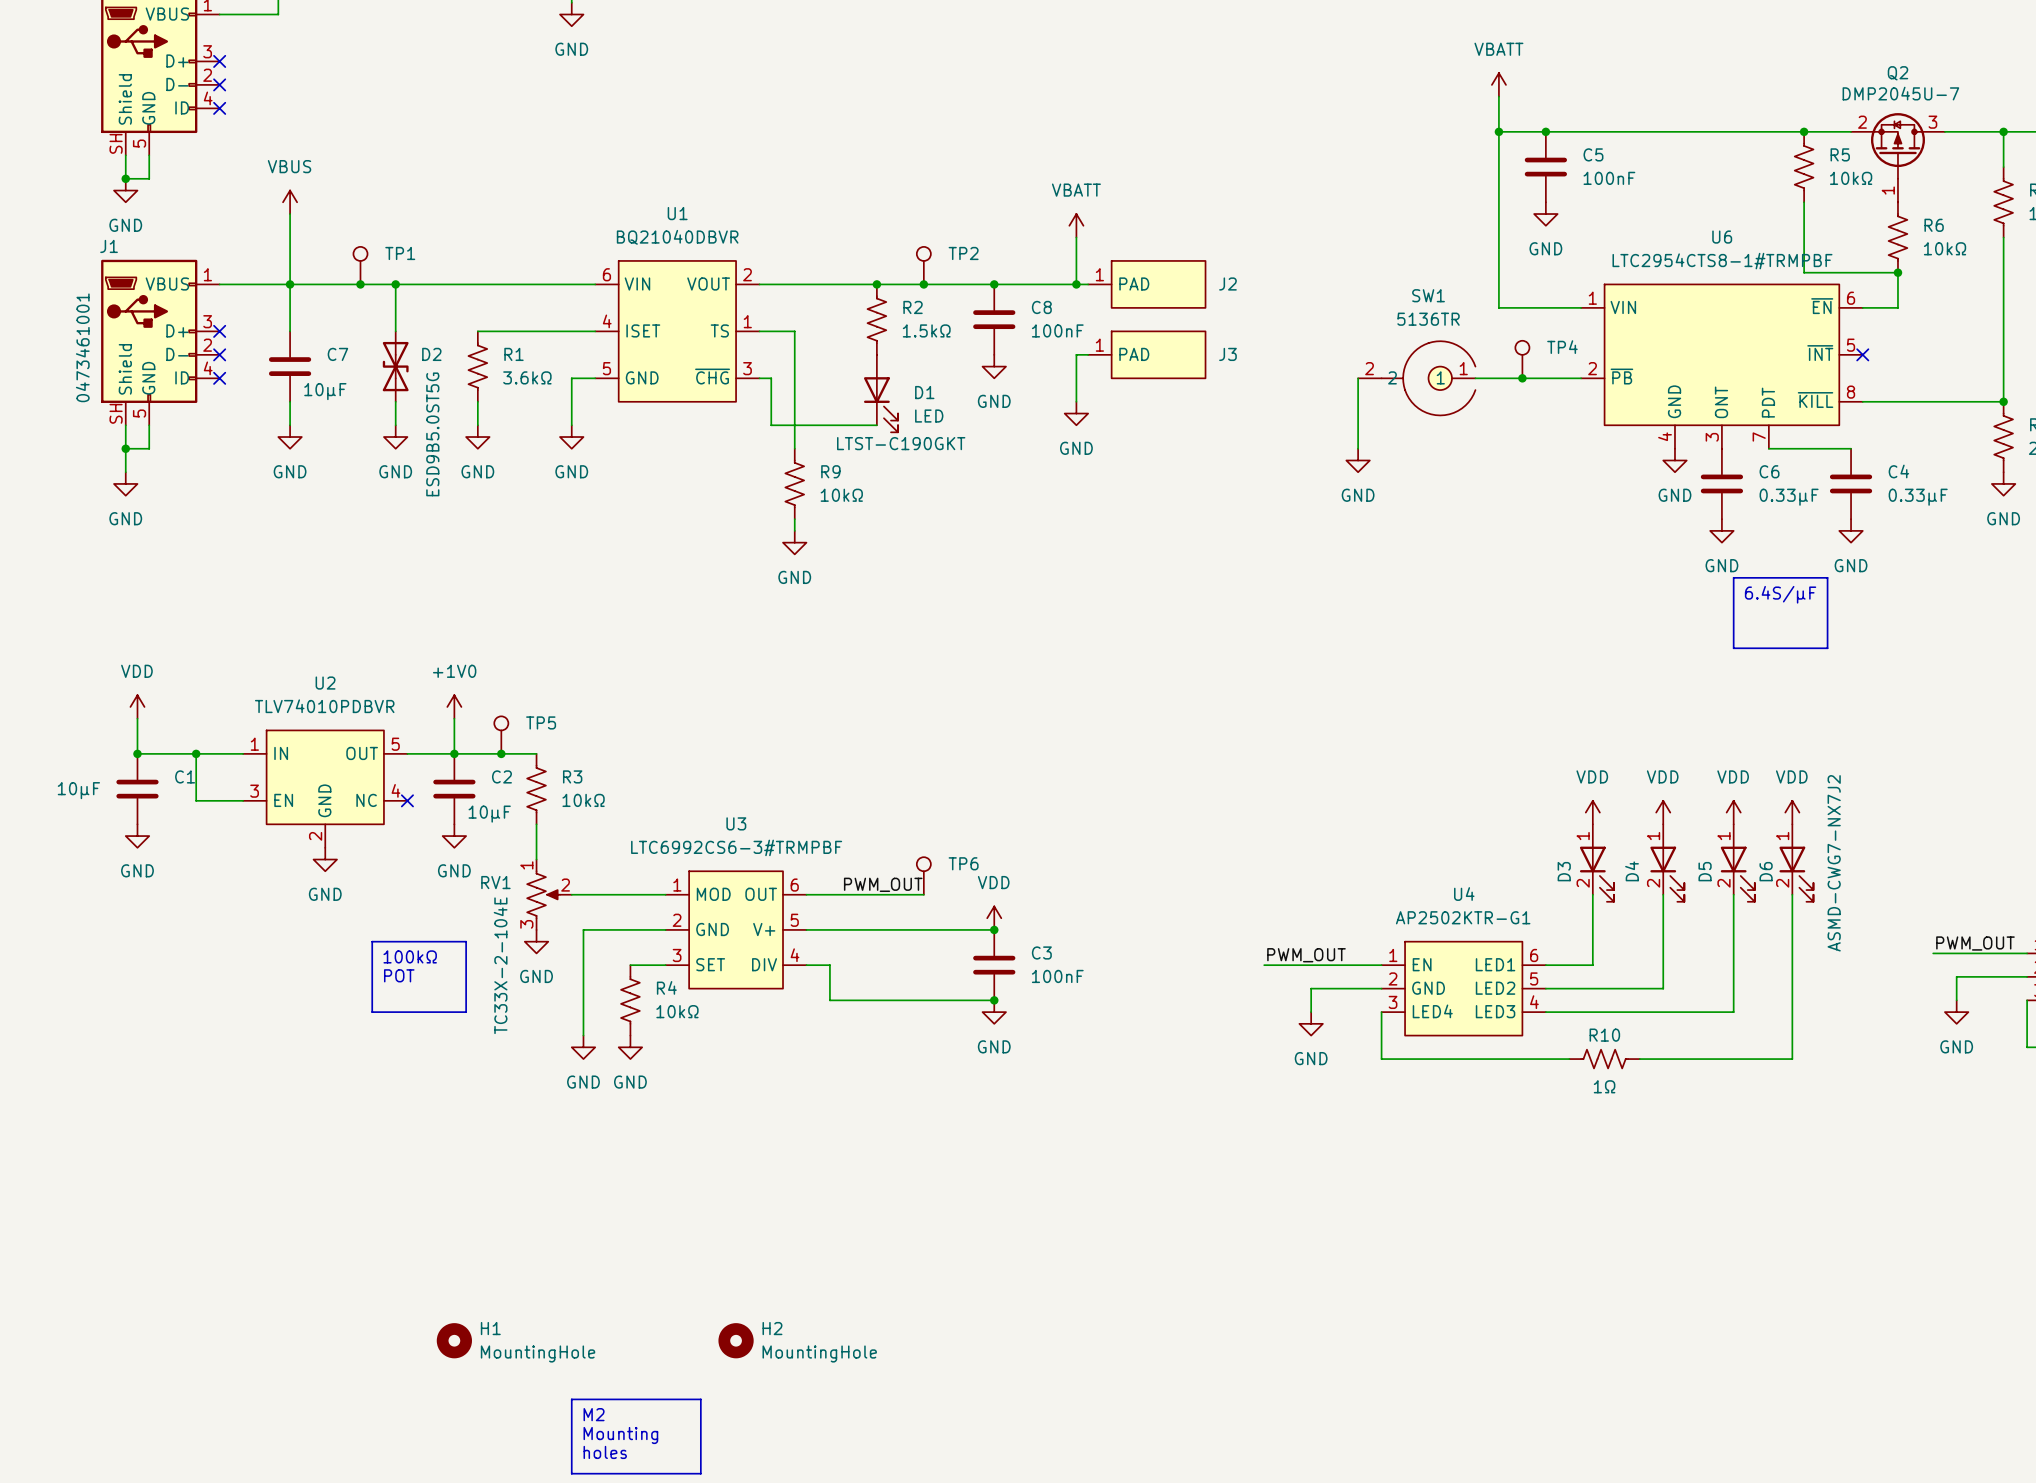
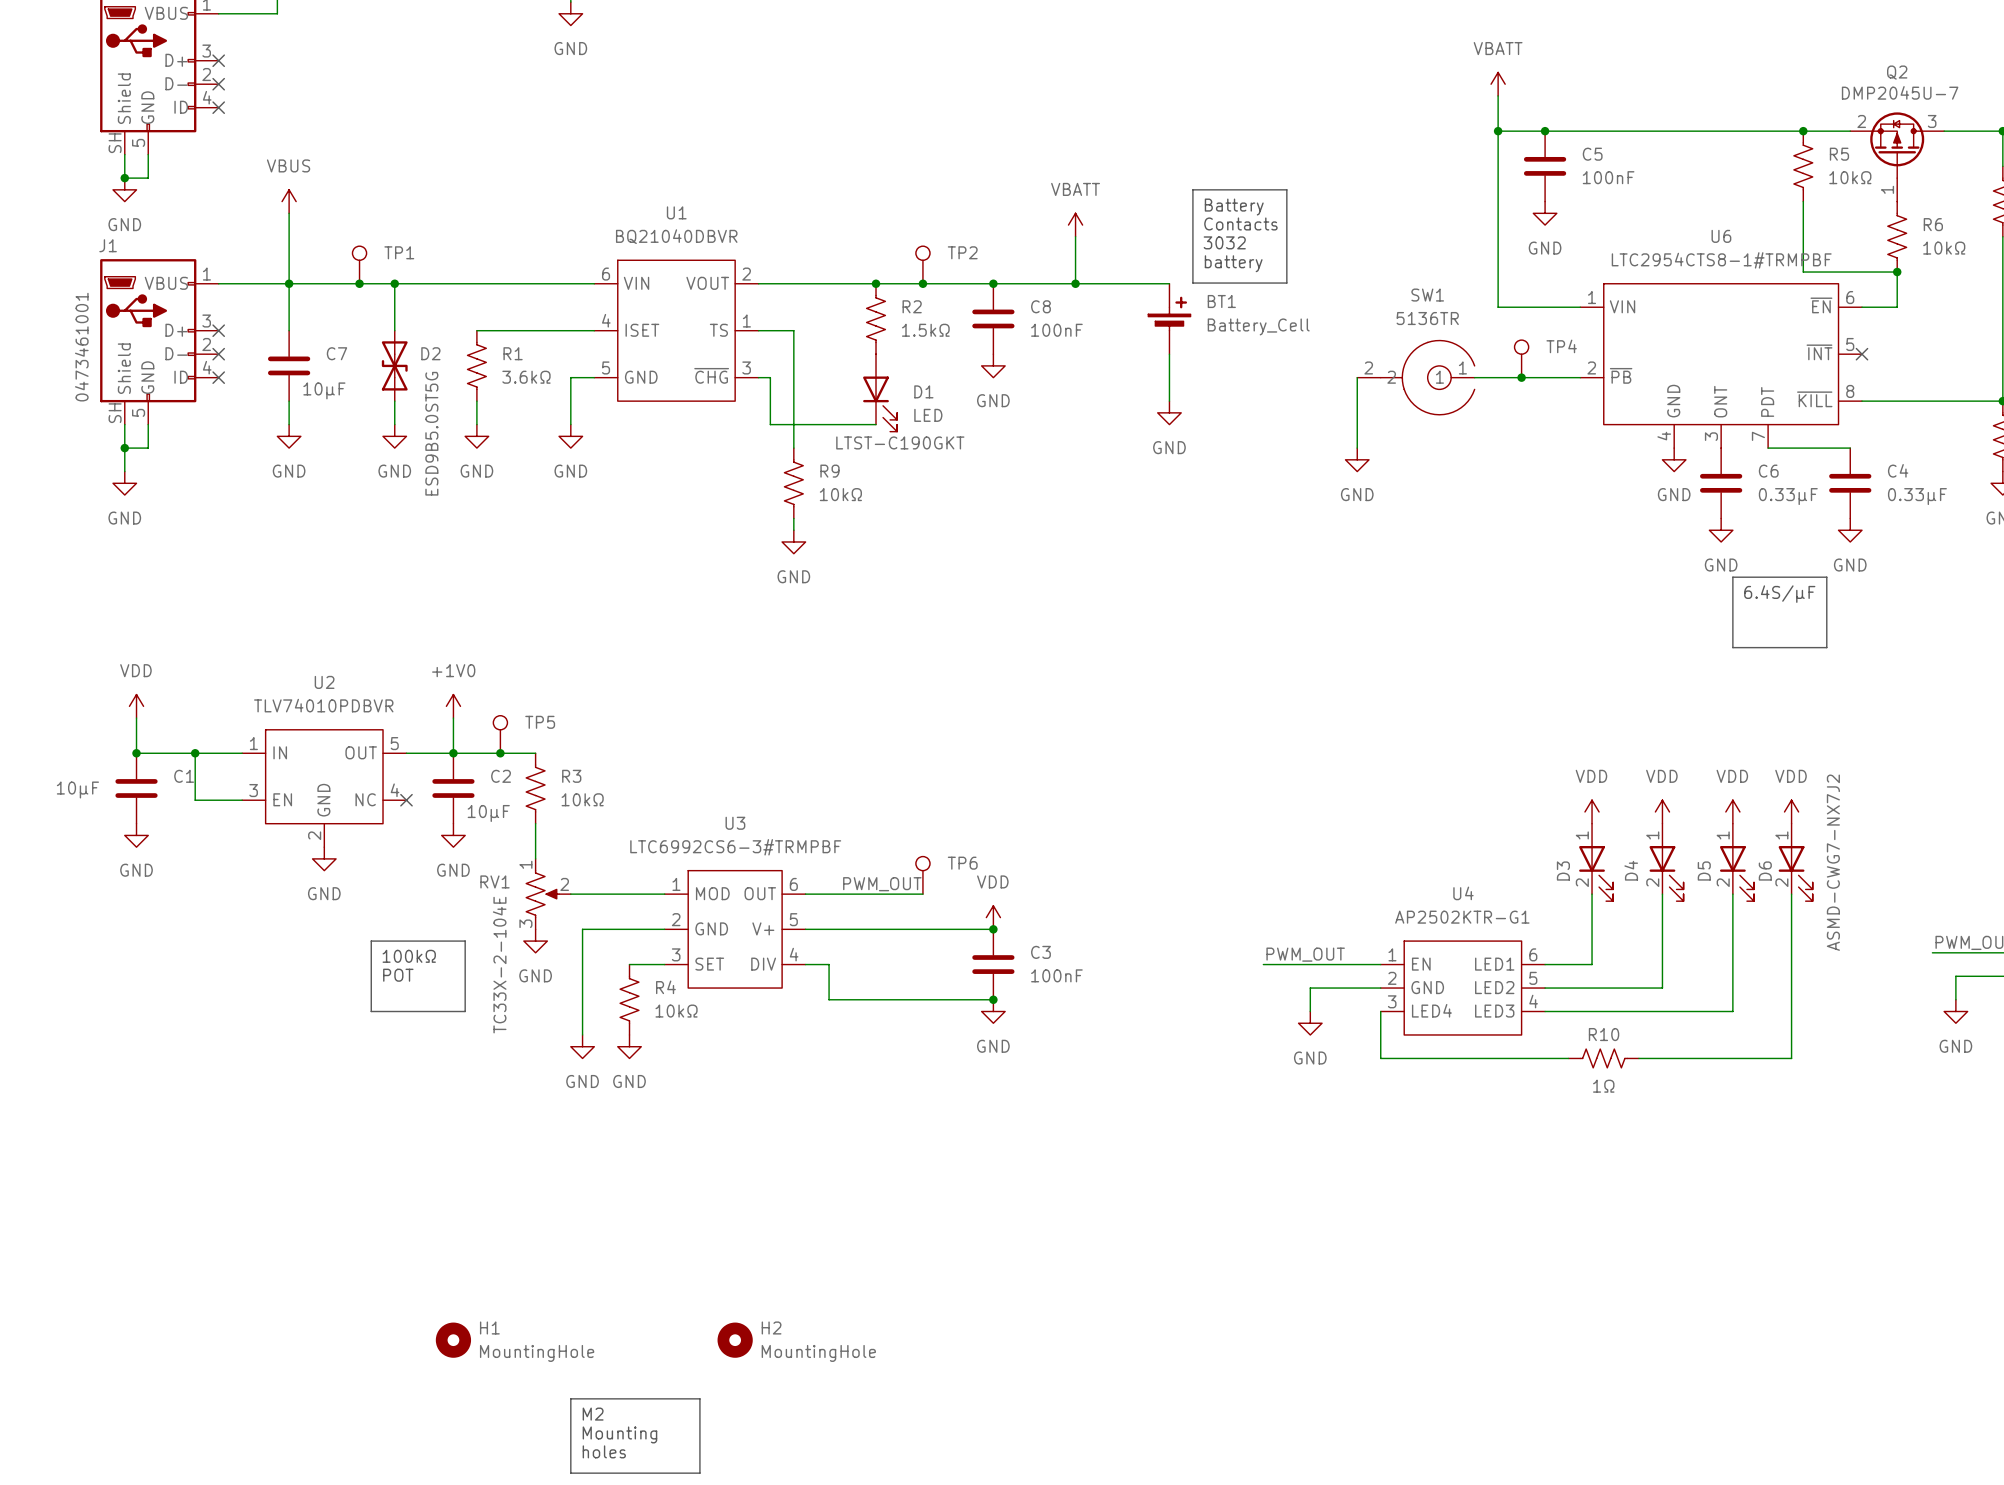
line: none -> (1192, 189) (1286, 189) (1286, 283) (1192, 283) (1192, 189)
text: none -> Battery (1234, 207)
text: none -> Contacts (1240, 223)
text: none -> 3032 (1224, 242)
text: none -> battery (1233, 263)
J2: (1146, 284) -> none
BT1: none -> Battery_Cell (1169, 318)
wire: (1088, 354) (1076, 354) (1076, 401) -> none
J3: (1146, 354) -> none
wire: none -> (1169, 354) (1169, 401)
power symbol position: GND (1076, 413) -> GND (1169, 412)

